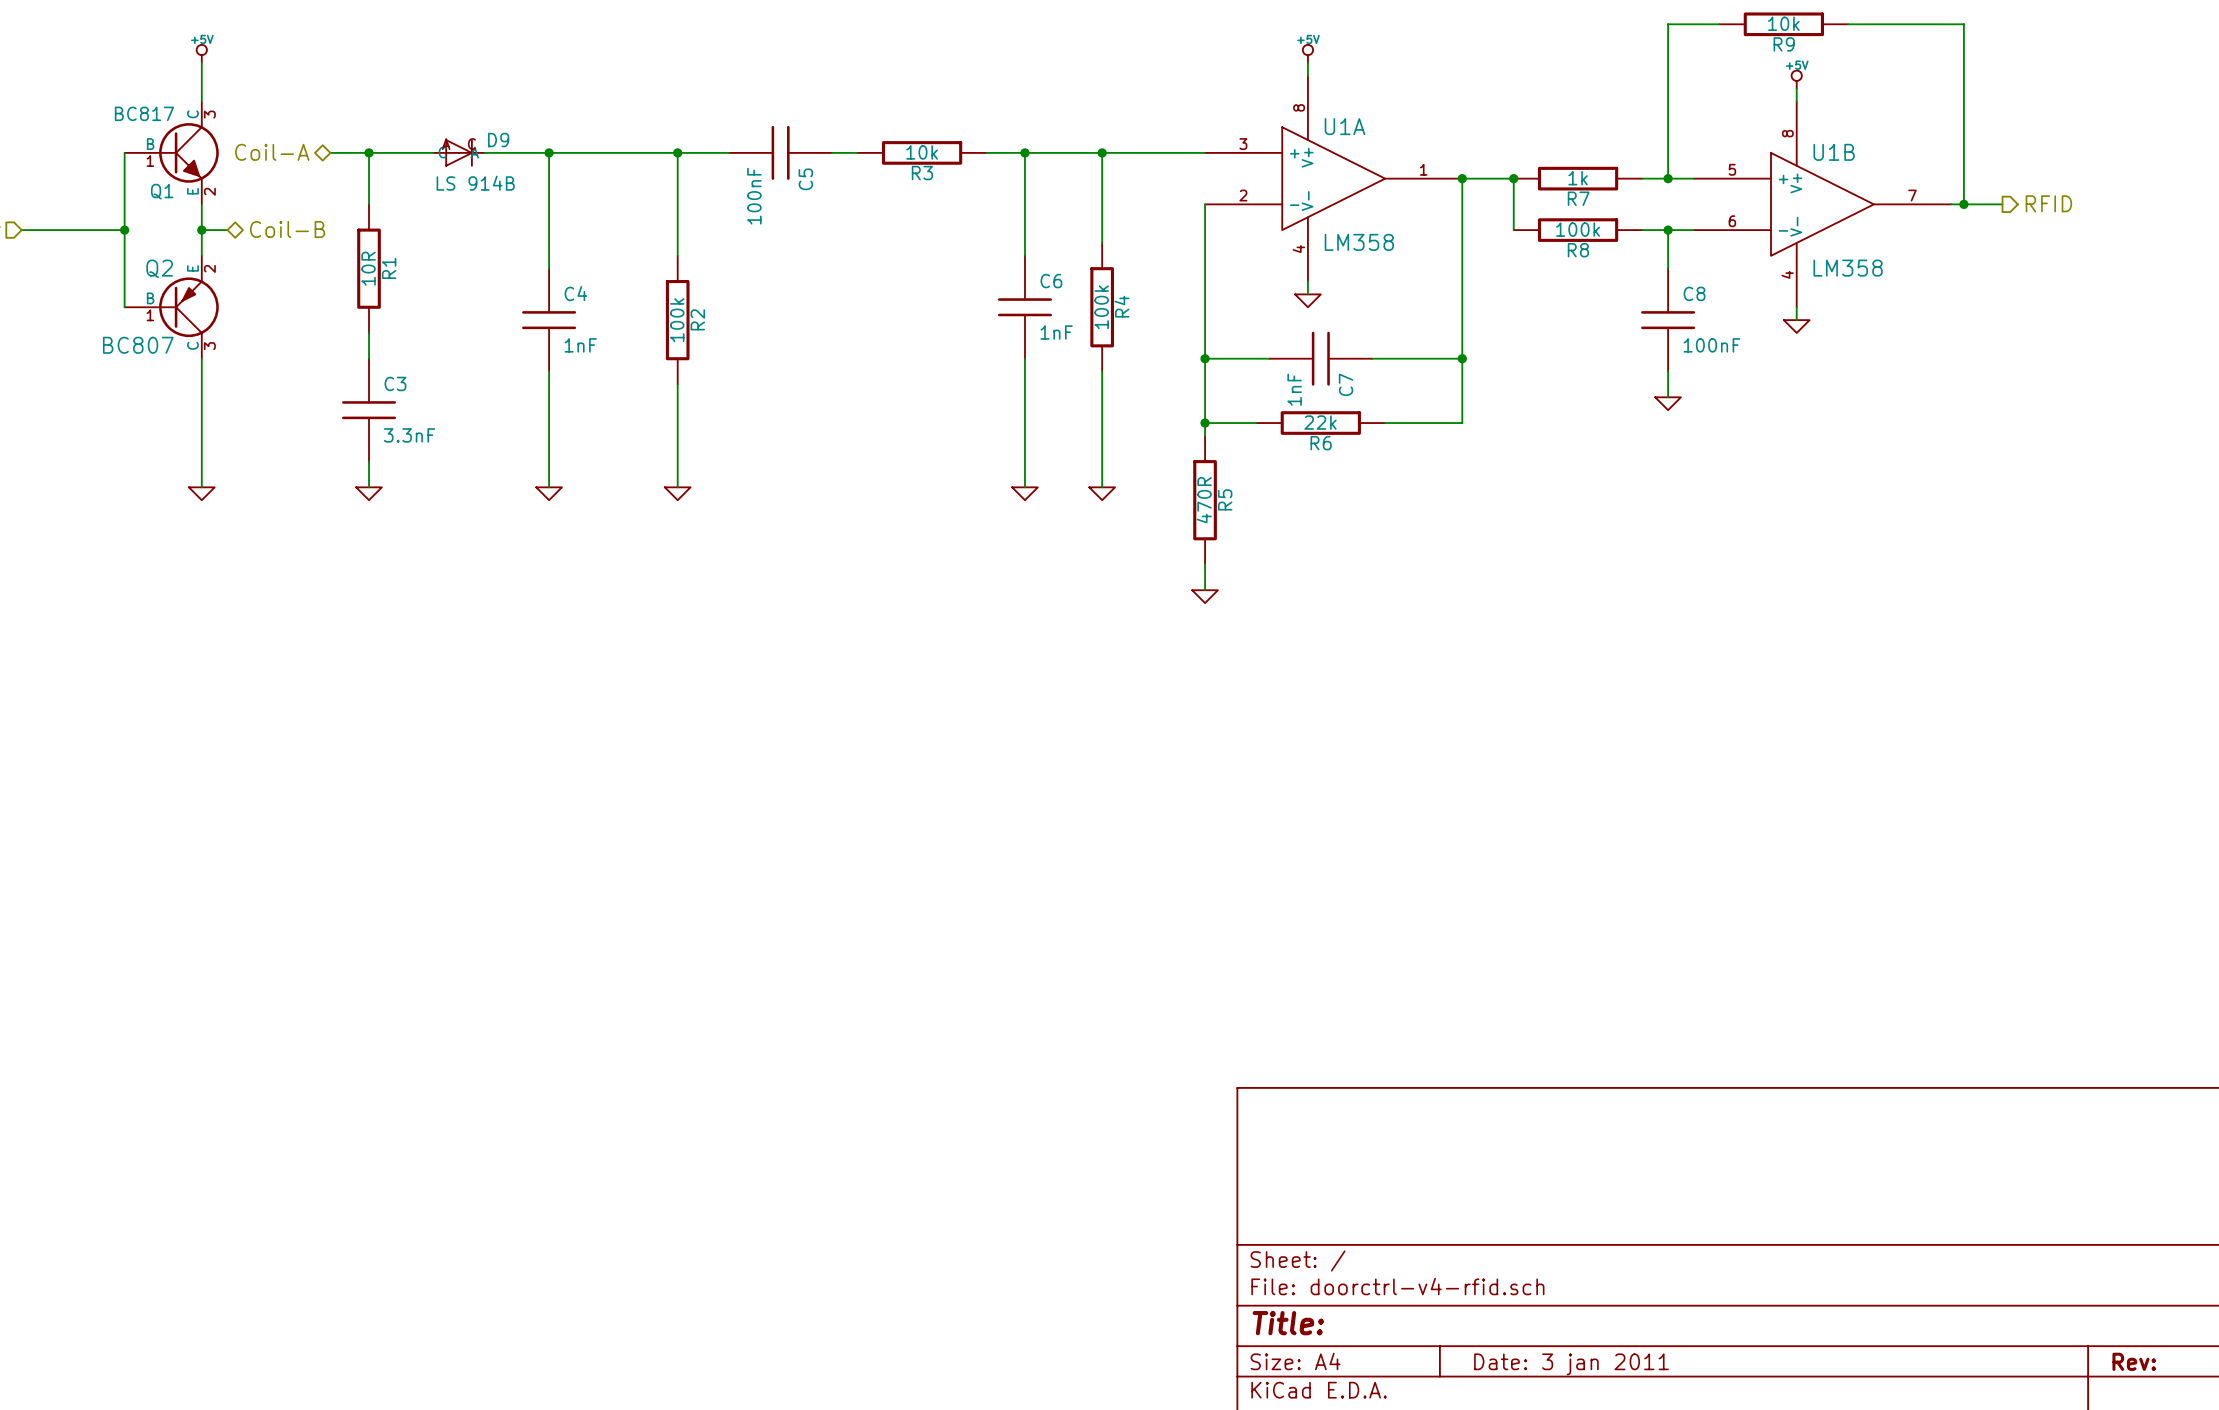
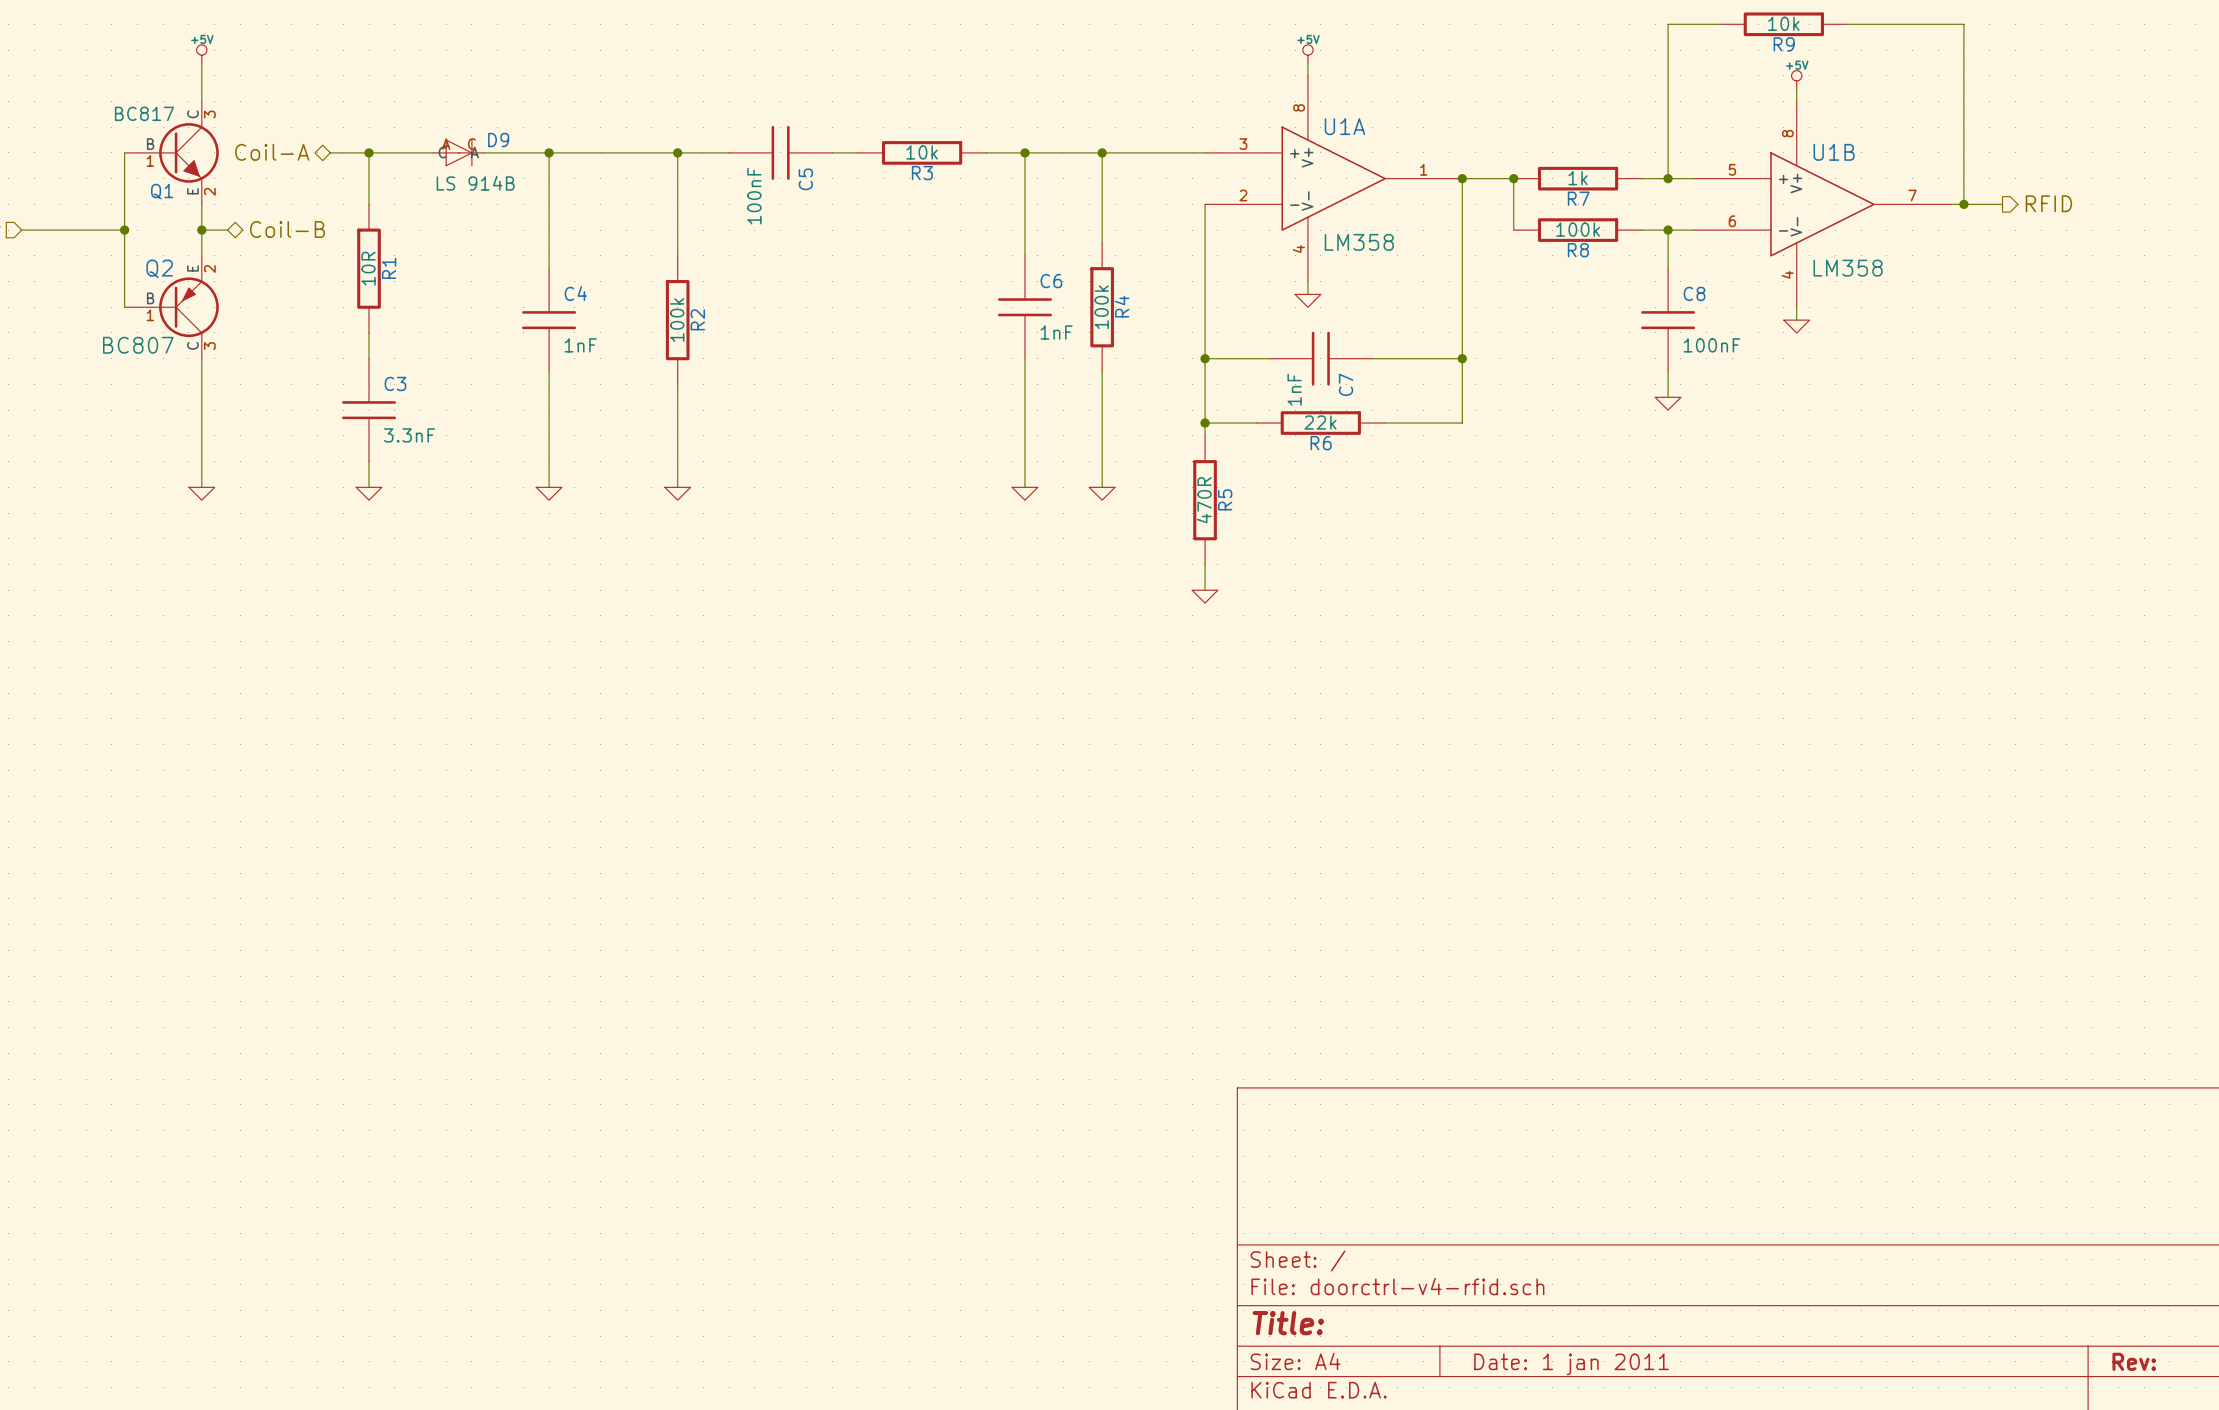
title block: Date: 3 jan 2011 (1571, 1364) -> Date: 1 jan 2011 (1571, 1364)

